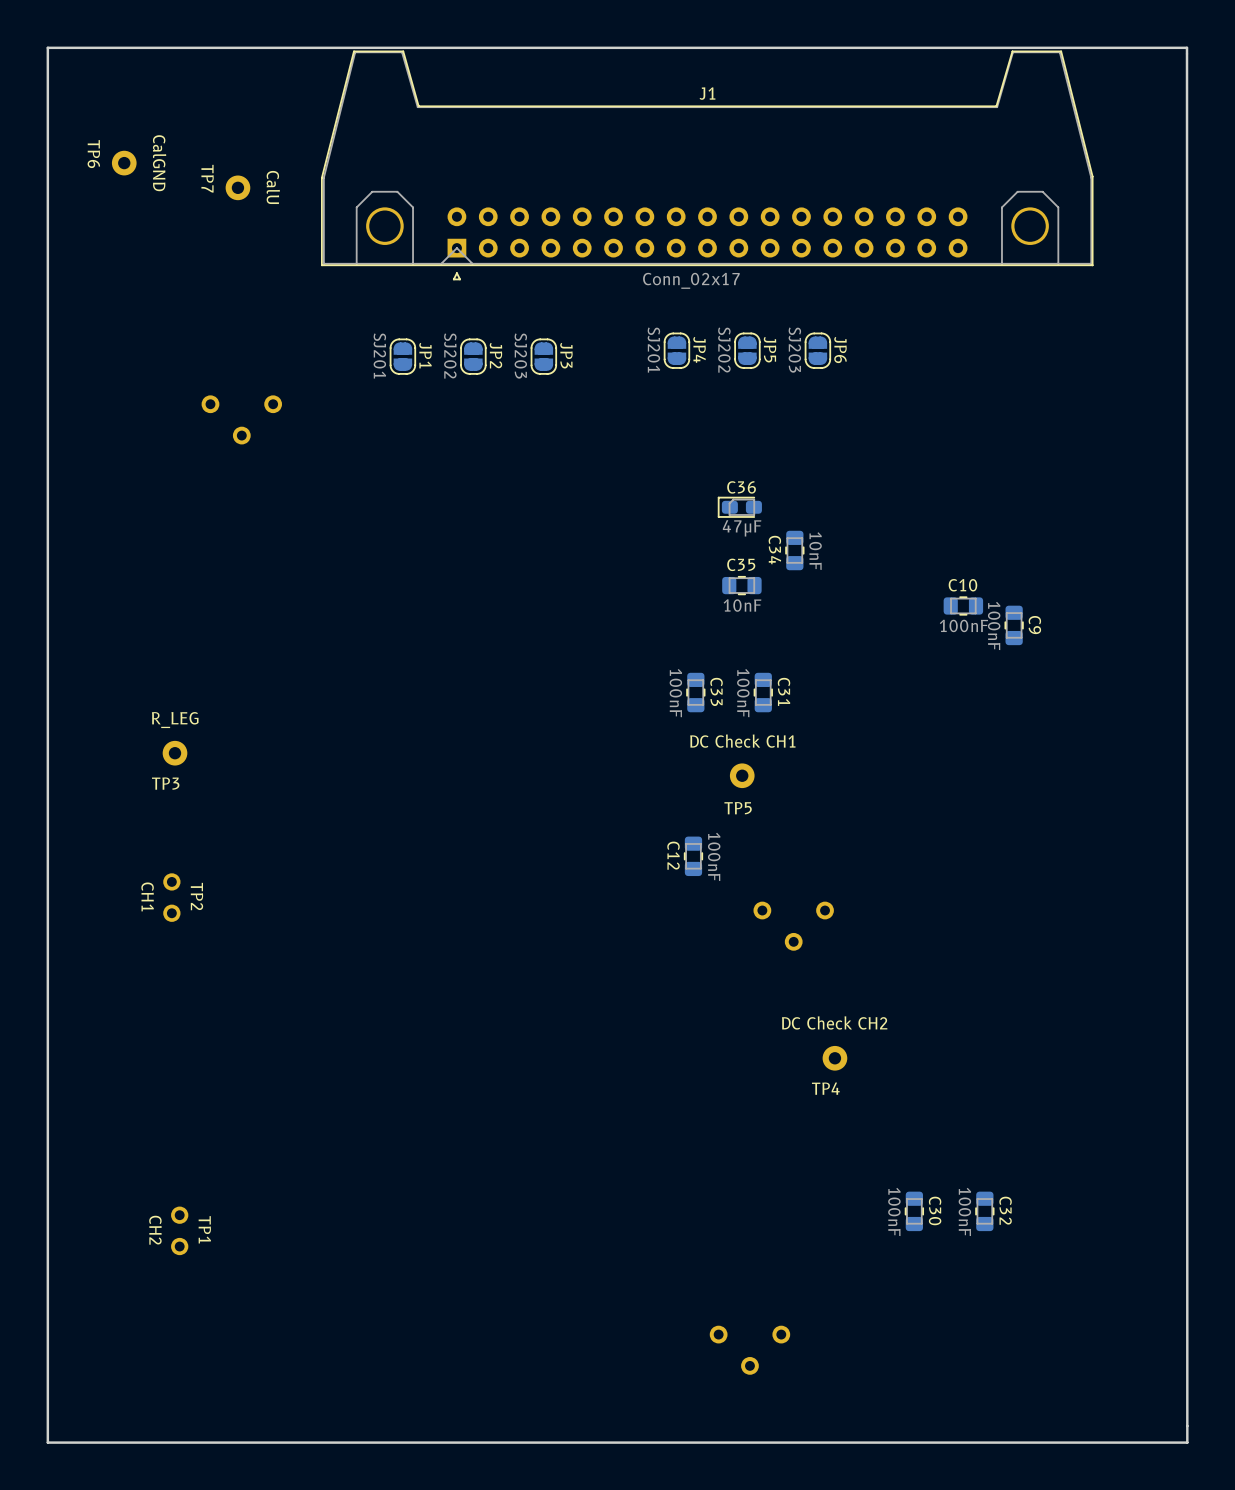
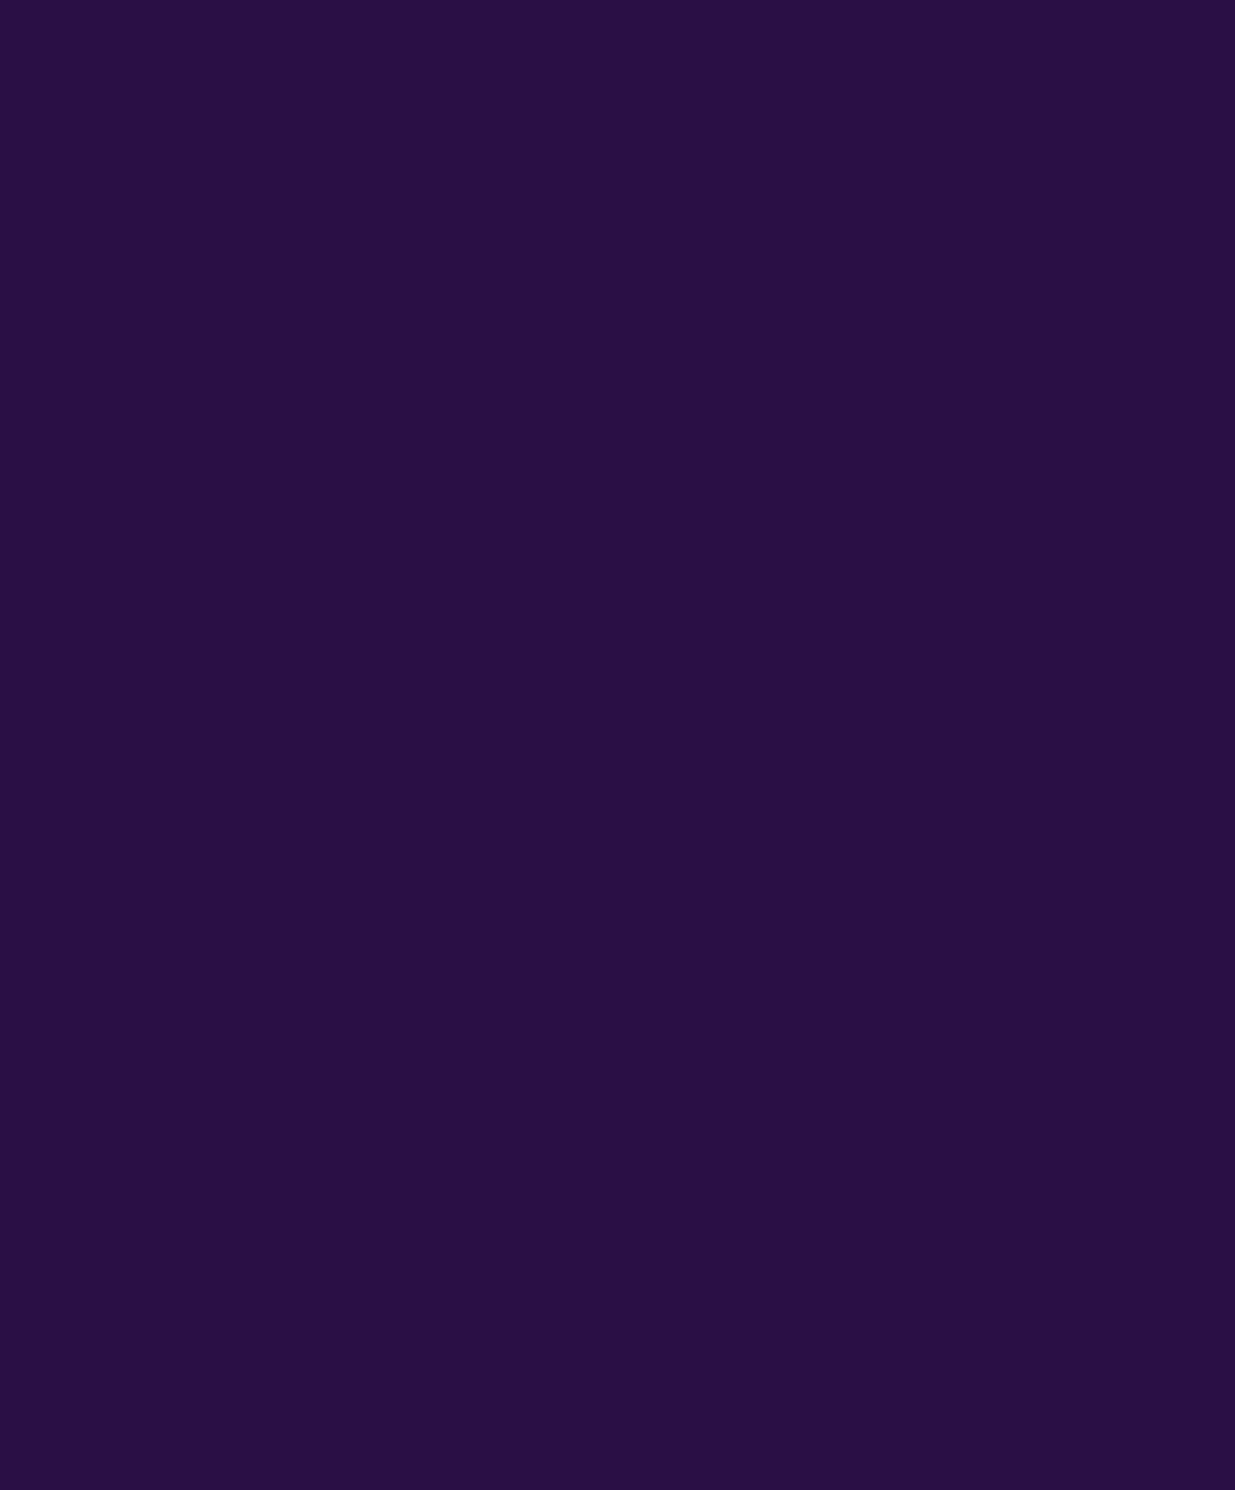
board edge: (1187, 53) (1187, 47) (47, 47) (47, 1442) (1187, 1442) (1187, 54) -> none
TP6: CalGND (124, 163) -> none
J1: Conn_02x17 (707, 165) -> none
TP7: CalU (237, 187) -> none
JP4: SJ201 (676, 350) -> none
JP5: SJ202 (747, 350) -> none
JP6: SJ203 (817, 350) -> none
JP1: SJ201 (402, 356) -> none
JP2: SJ202 (473, 356) -> none
JP3: SJ203 (543, 356) -> none
part: (241, 419) -> none
C36: 47μF (739, 507) -> none
C34: 10nF (794, 550) -> none
C35: 10nF (741, 585) -> none
C10: 100nF (963, 605) -> none
C9: 100nF (1014, 625) -> none
C33: 100nF (695, 692) -> none
C31: 100nF (763, 692) -> none
TP3: R_LEG (175, 753) -> none
TP5: DC Check CH1 (742, 775) -> none
C12: 100nF (693, 856) -> none
TP2: CH1 (171, 897) -> none
part: (793, 926) -> none
TP4: DC Check CH2 (834, 1058) -> none
C30: 100nF (914, 1211) -> none
C32: 100nF (984, 1211) -> none
TP1: CH2 (179, 1230) -> none
part: (749, 1350) -> none

